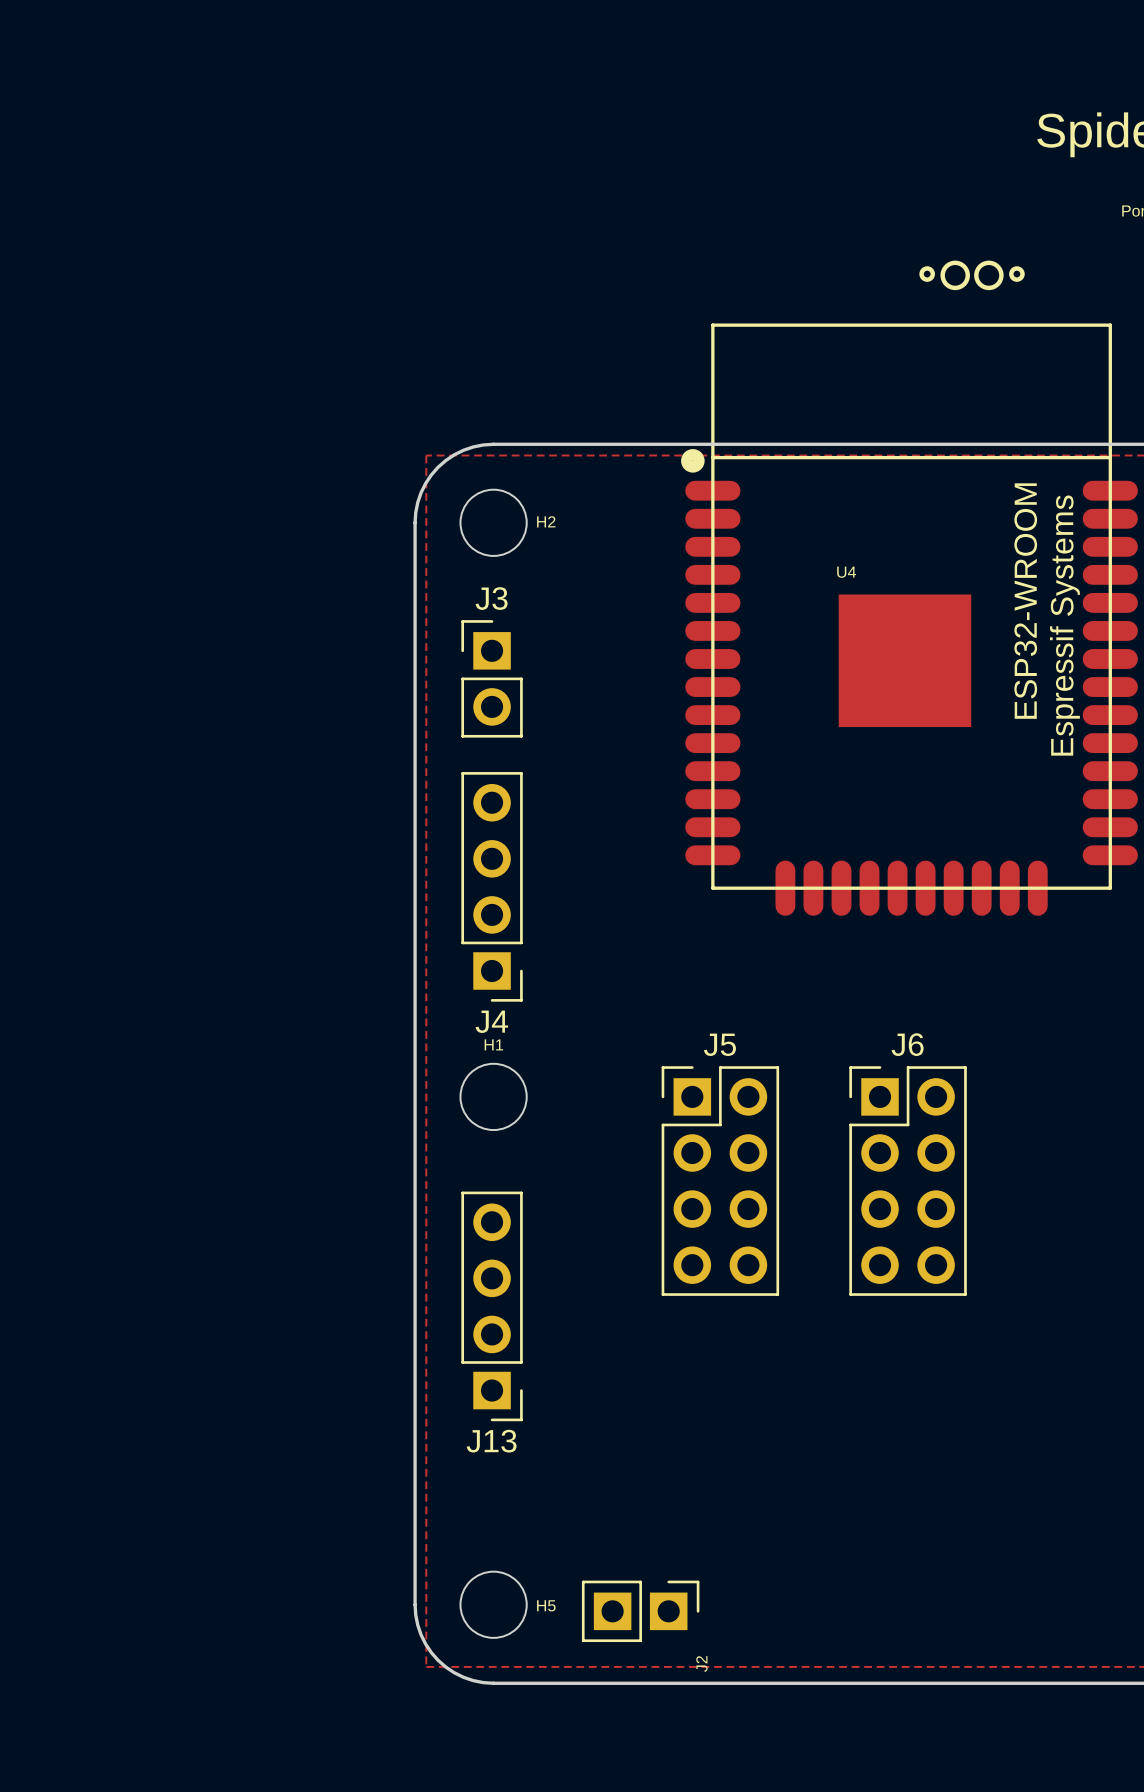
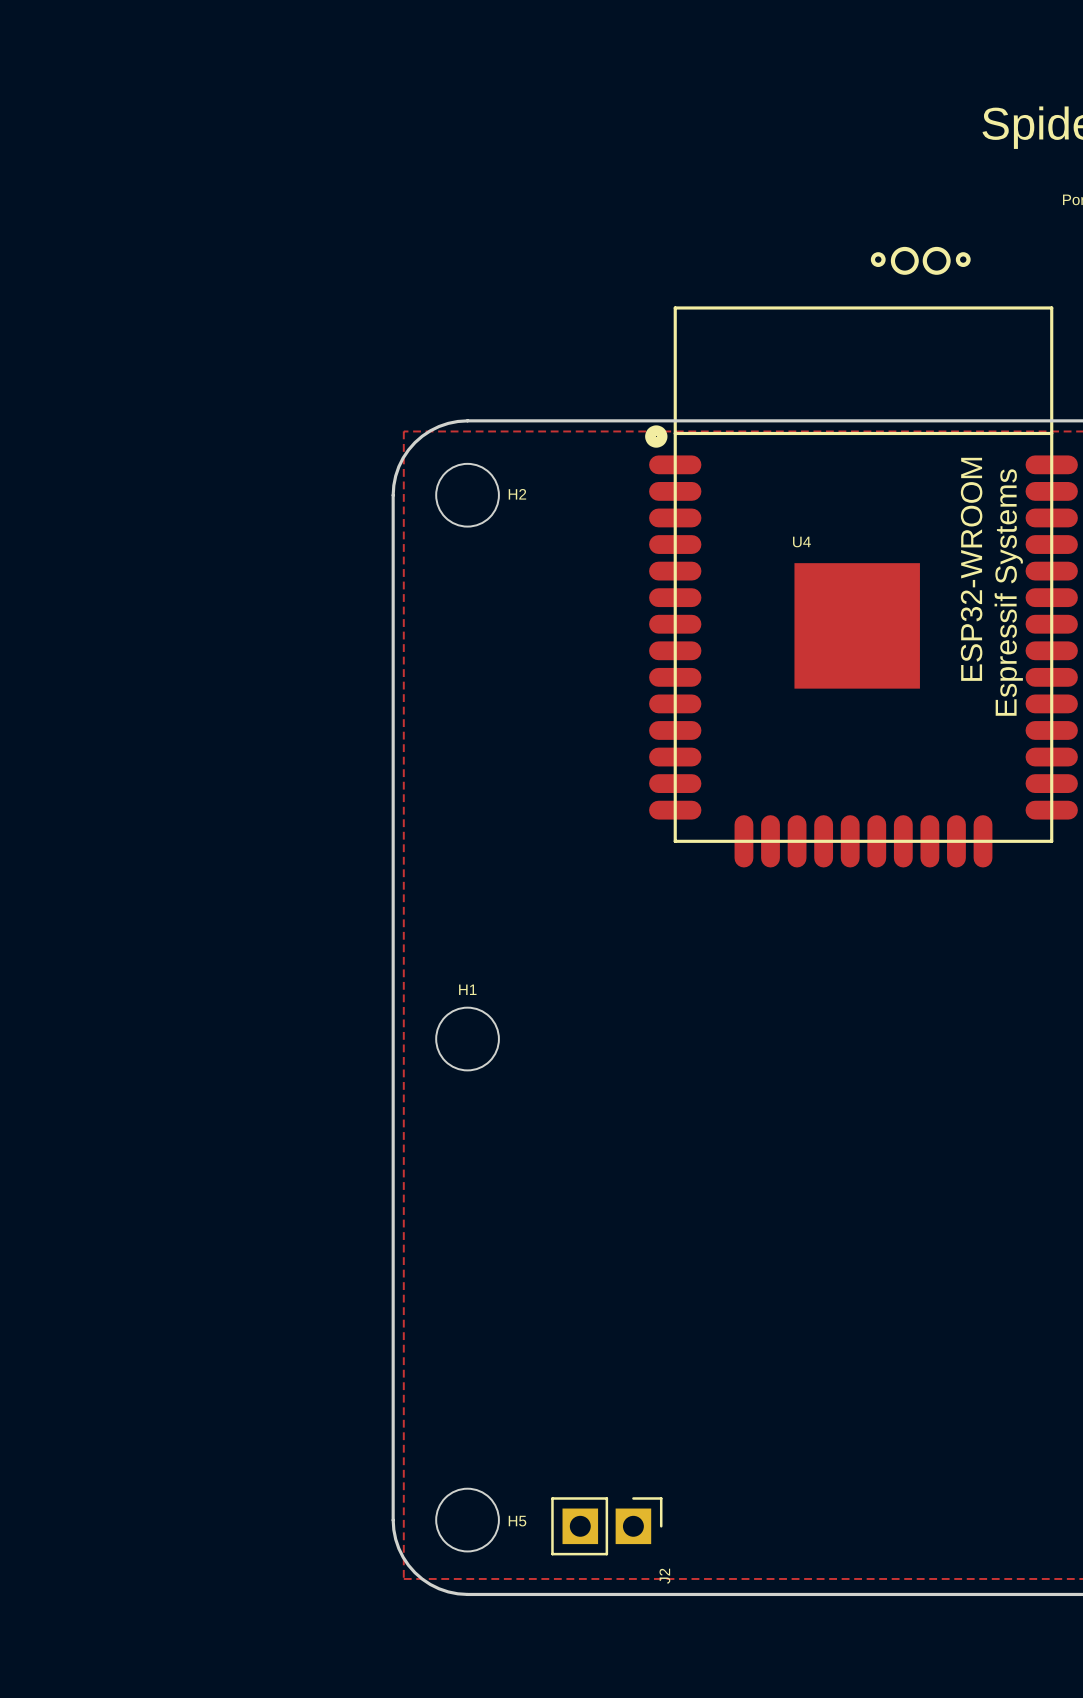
J3: (492, 678) -> none
J4: (492, 886) -> none
J5: (720, 1181) -> none
J6: (908, 1181) -> none
J13: (492, 1306) -> none

